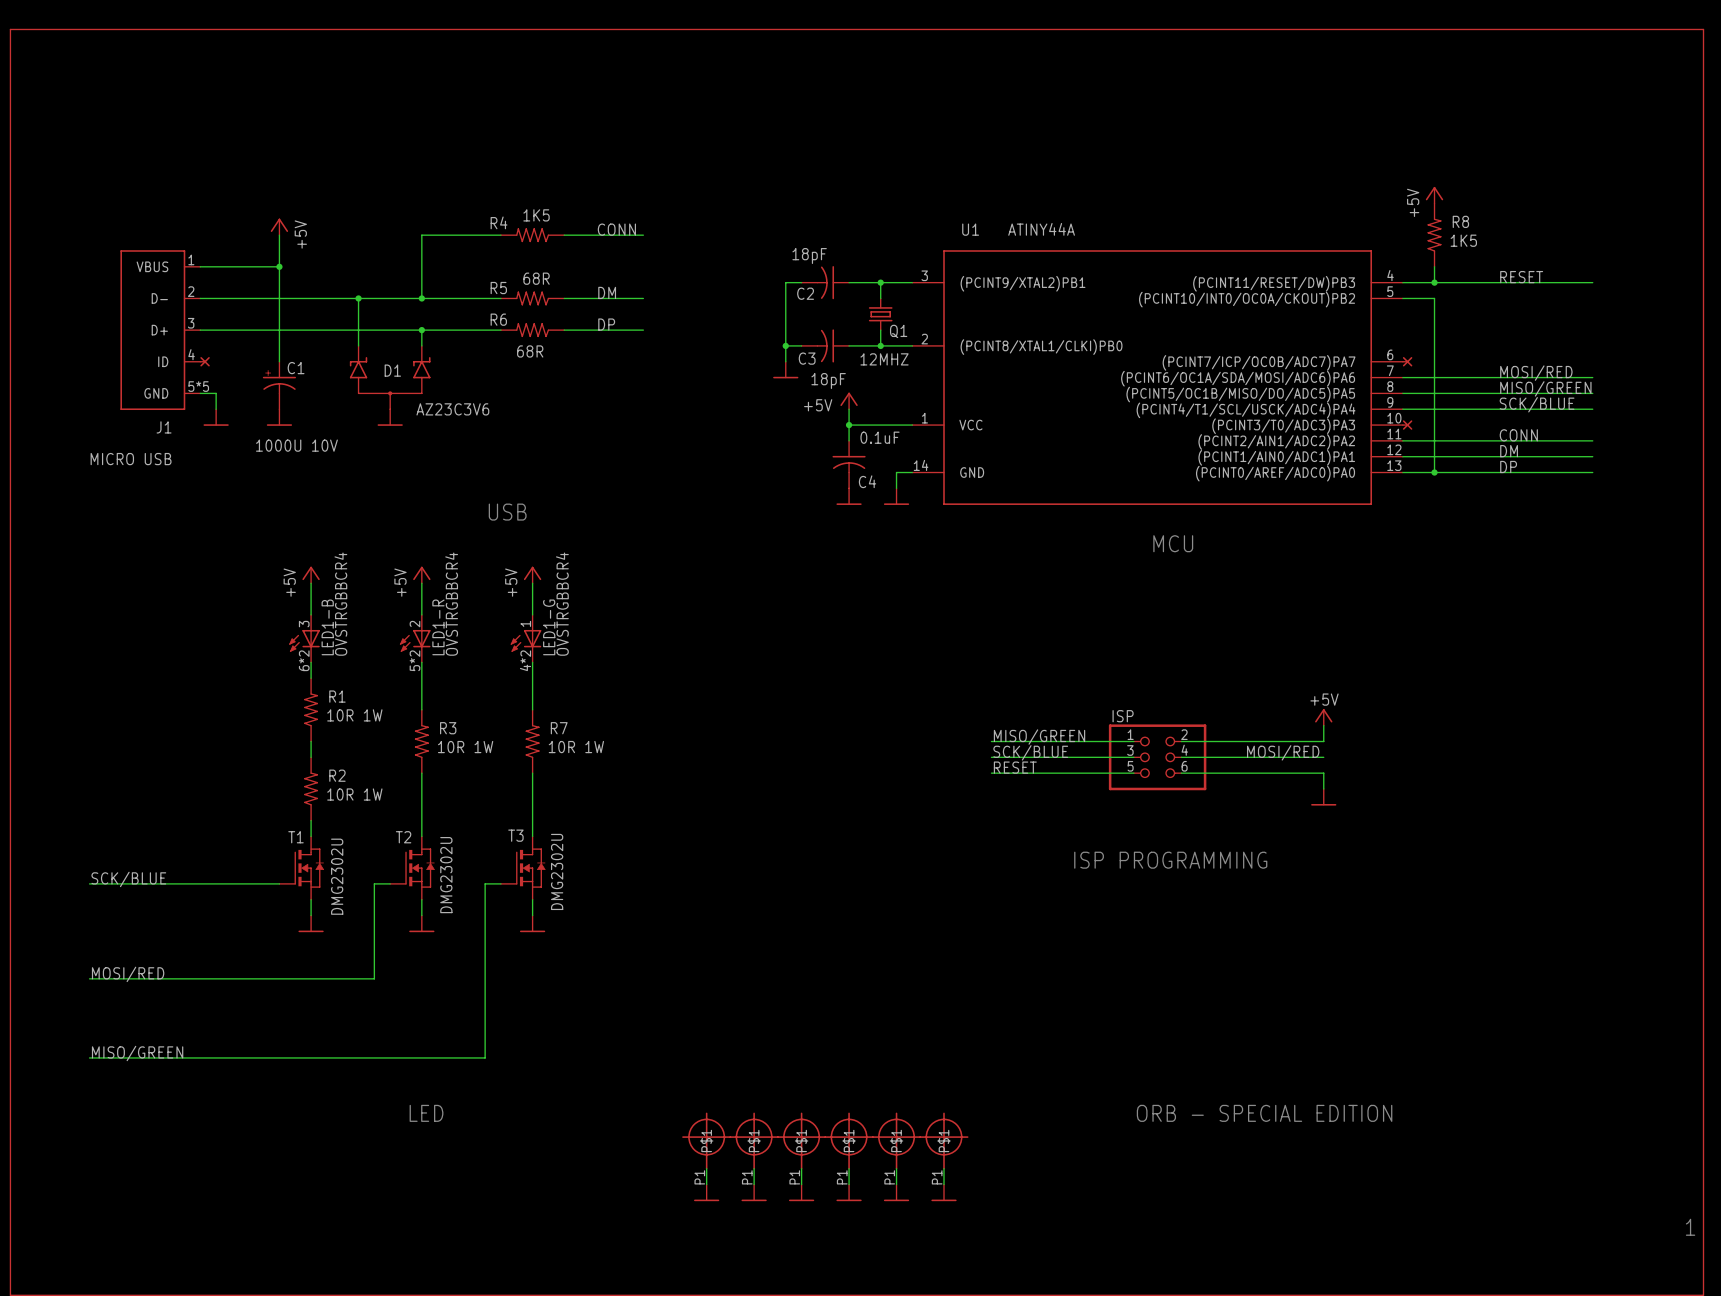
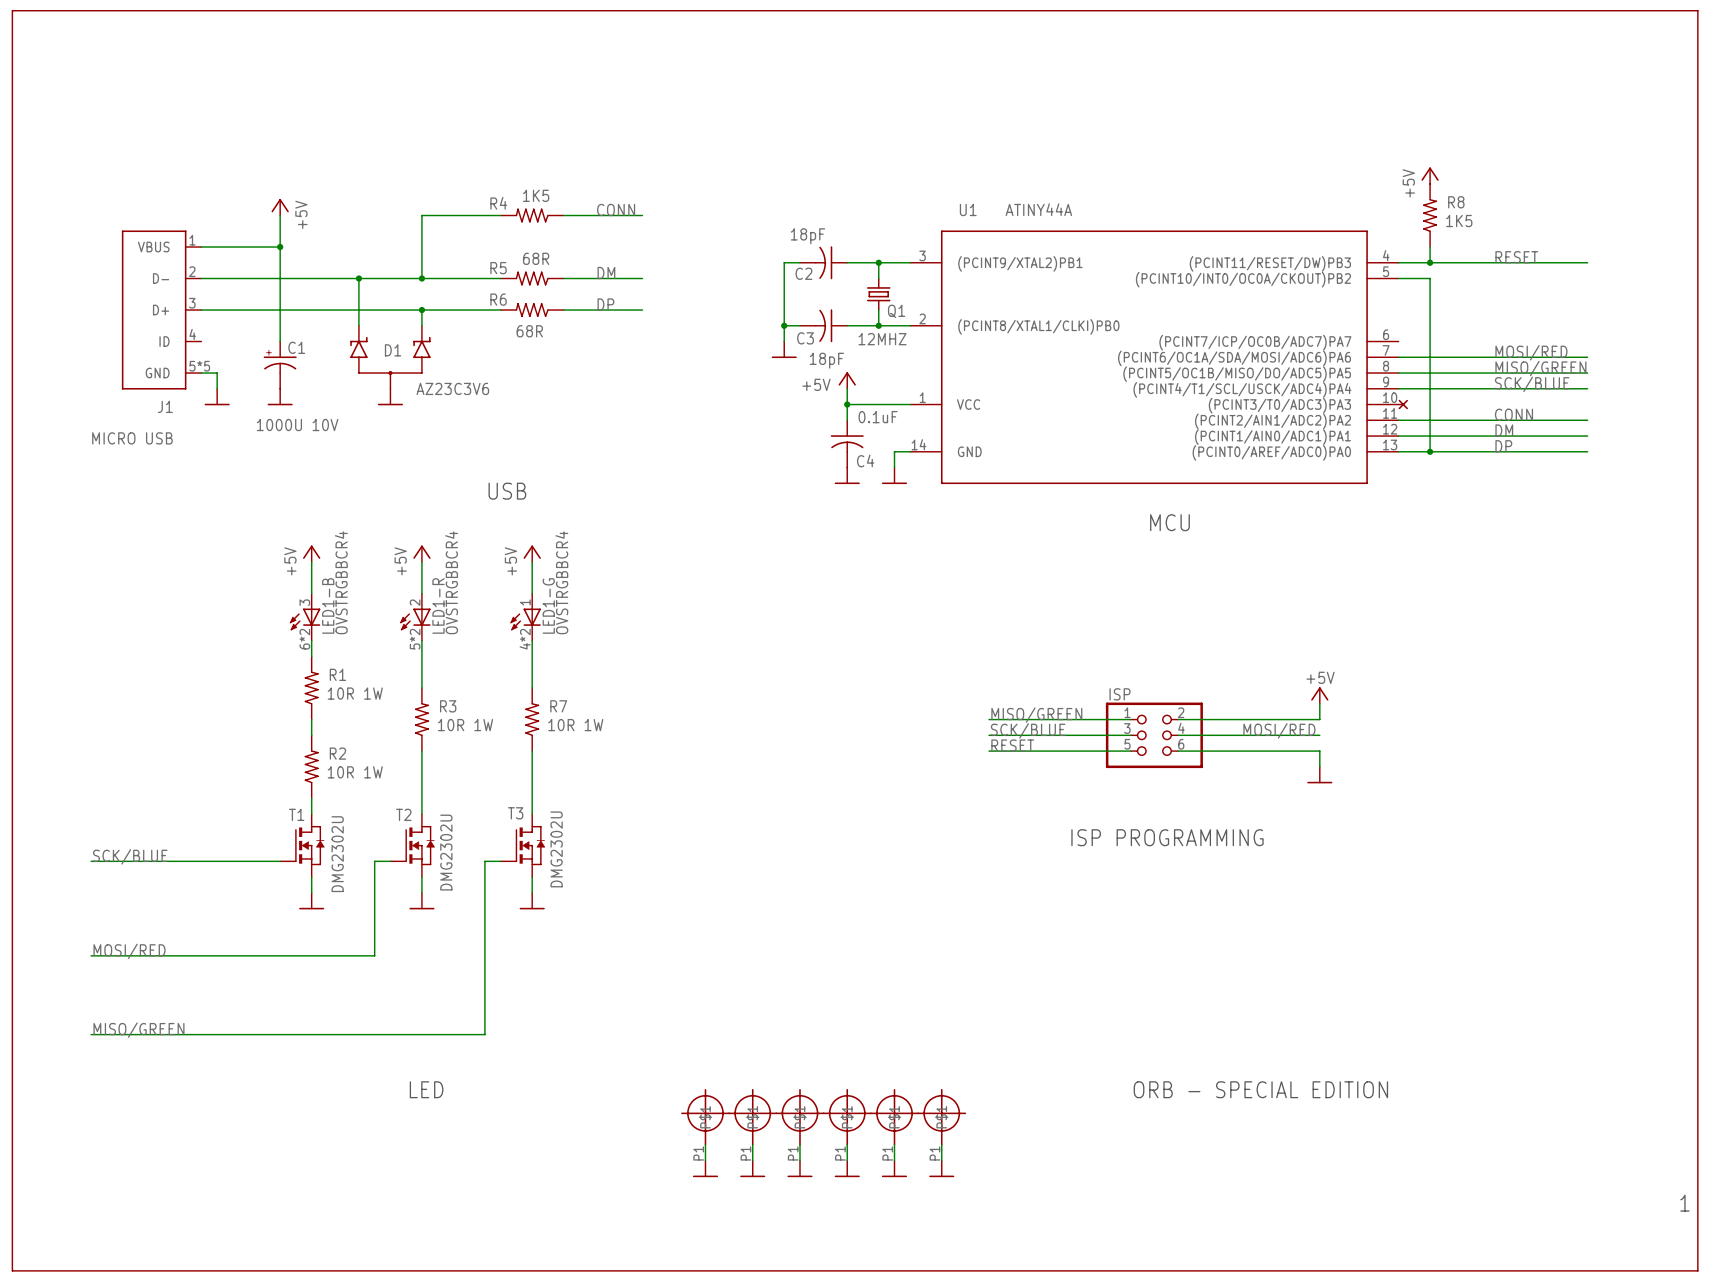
part: (204, 361) -> none
part: (1407, 361) -> none

